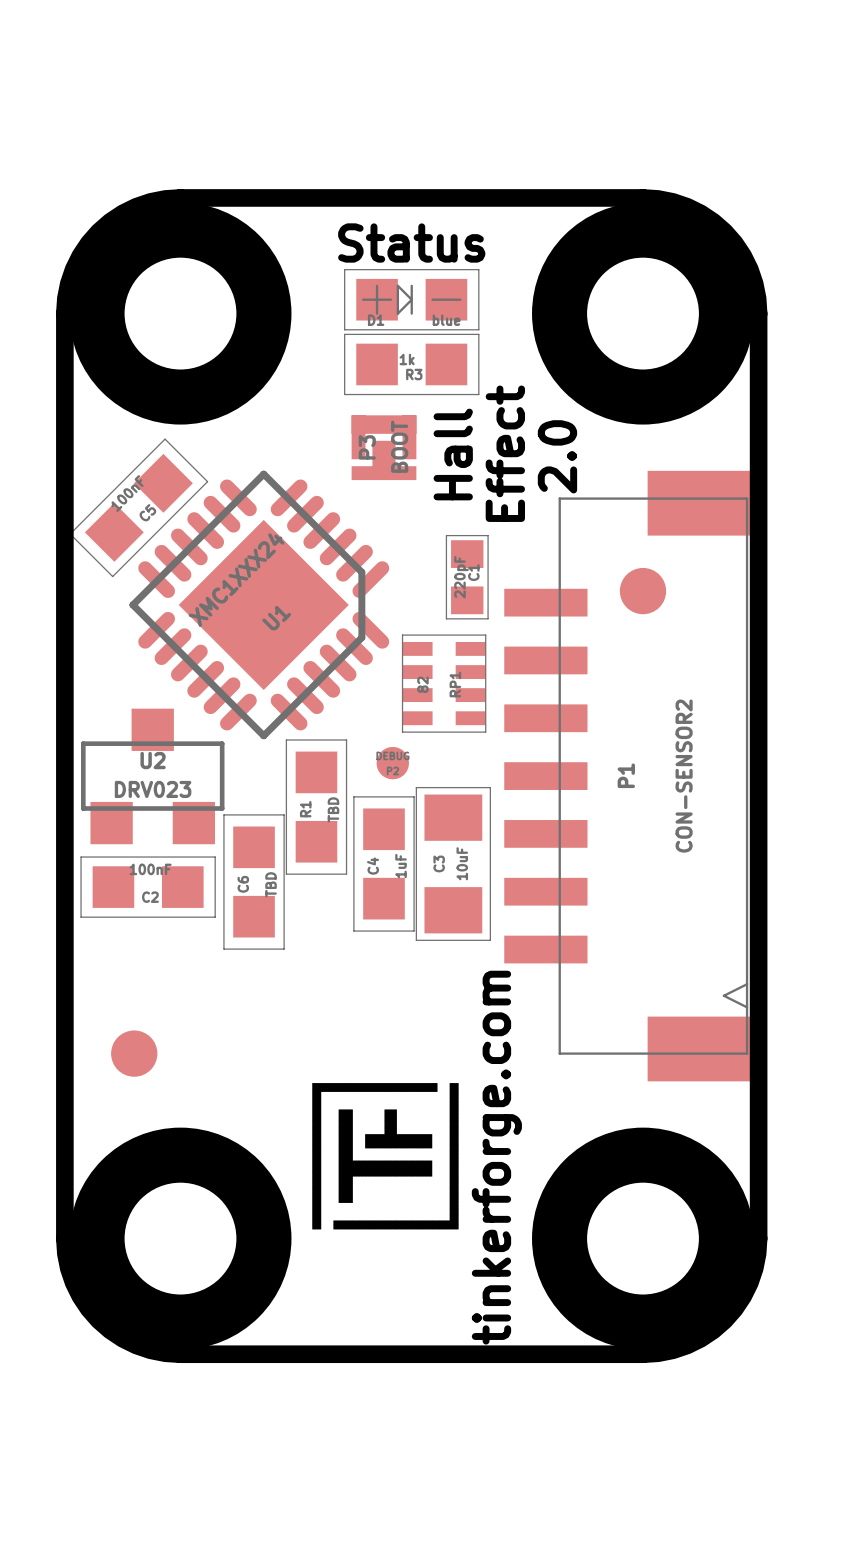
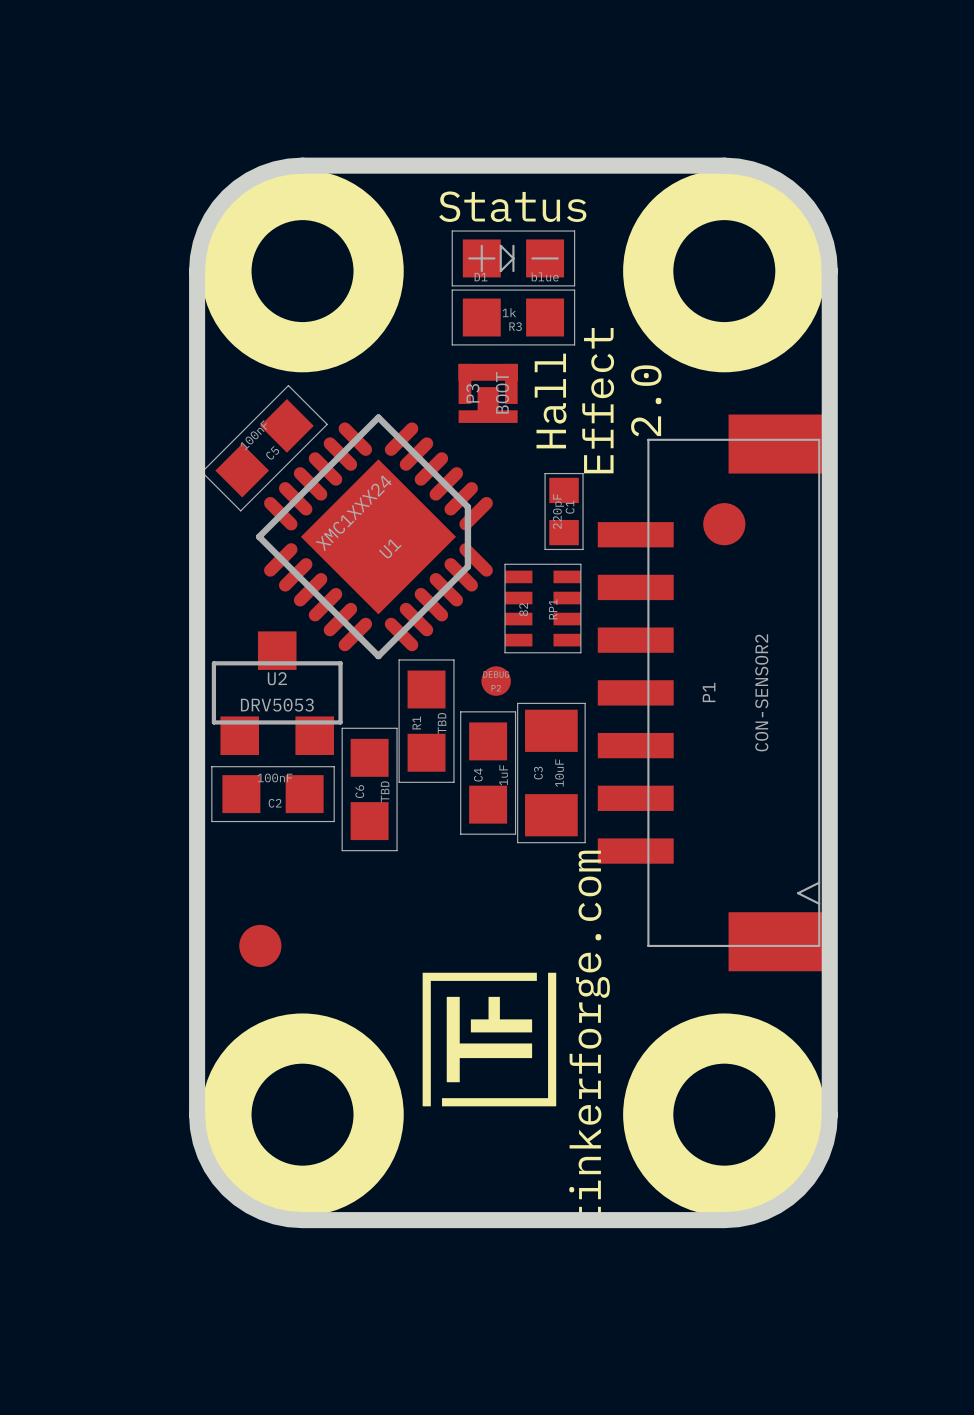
U2 value: DRV023 (153, 789) -> DRV5053 (277, 705)

